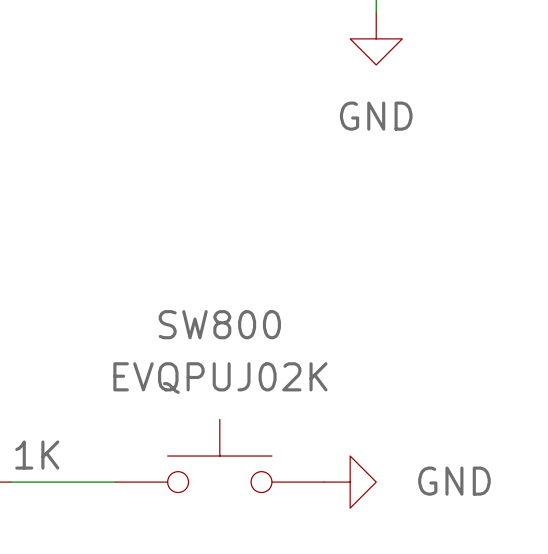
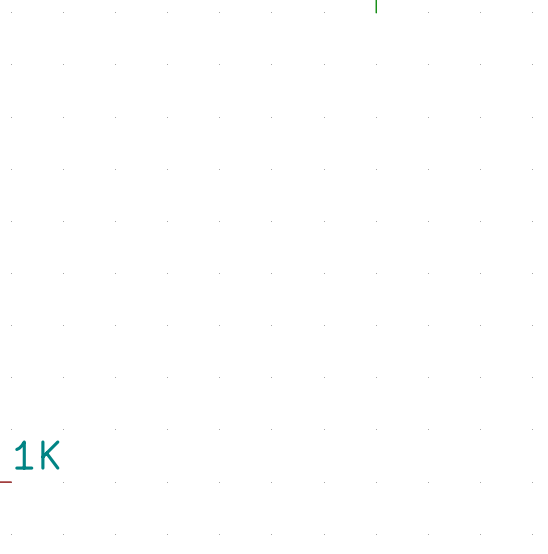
power symbol: GND (376, 38) -> none
SW800: EVQPUJ02K (219, 456) -> none
wire: (11, 482) (115, 482) -> none
power symbol: GND (350, 482) -> none

